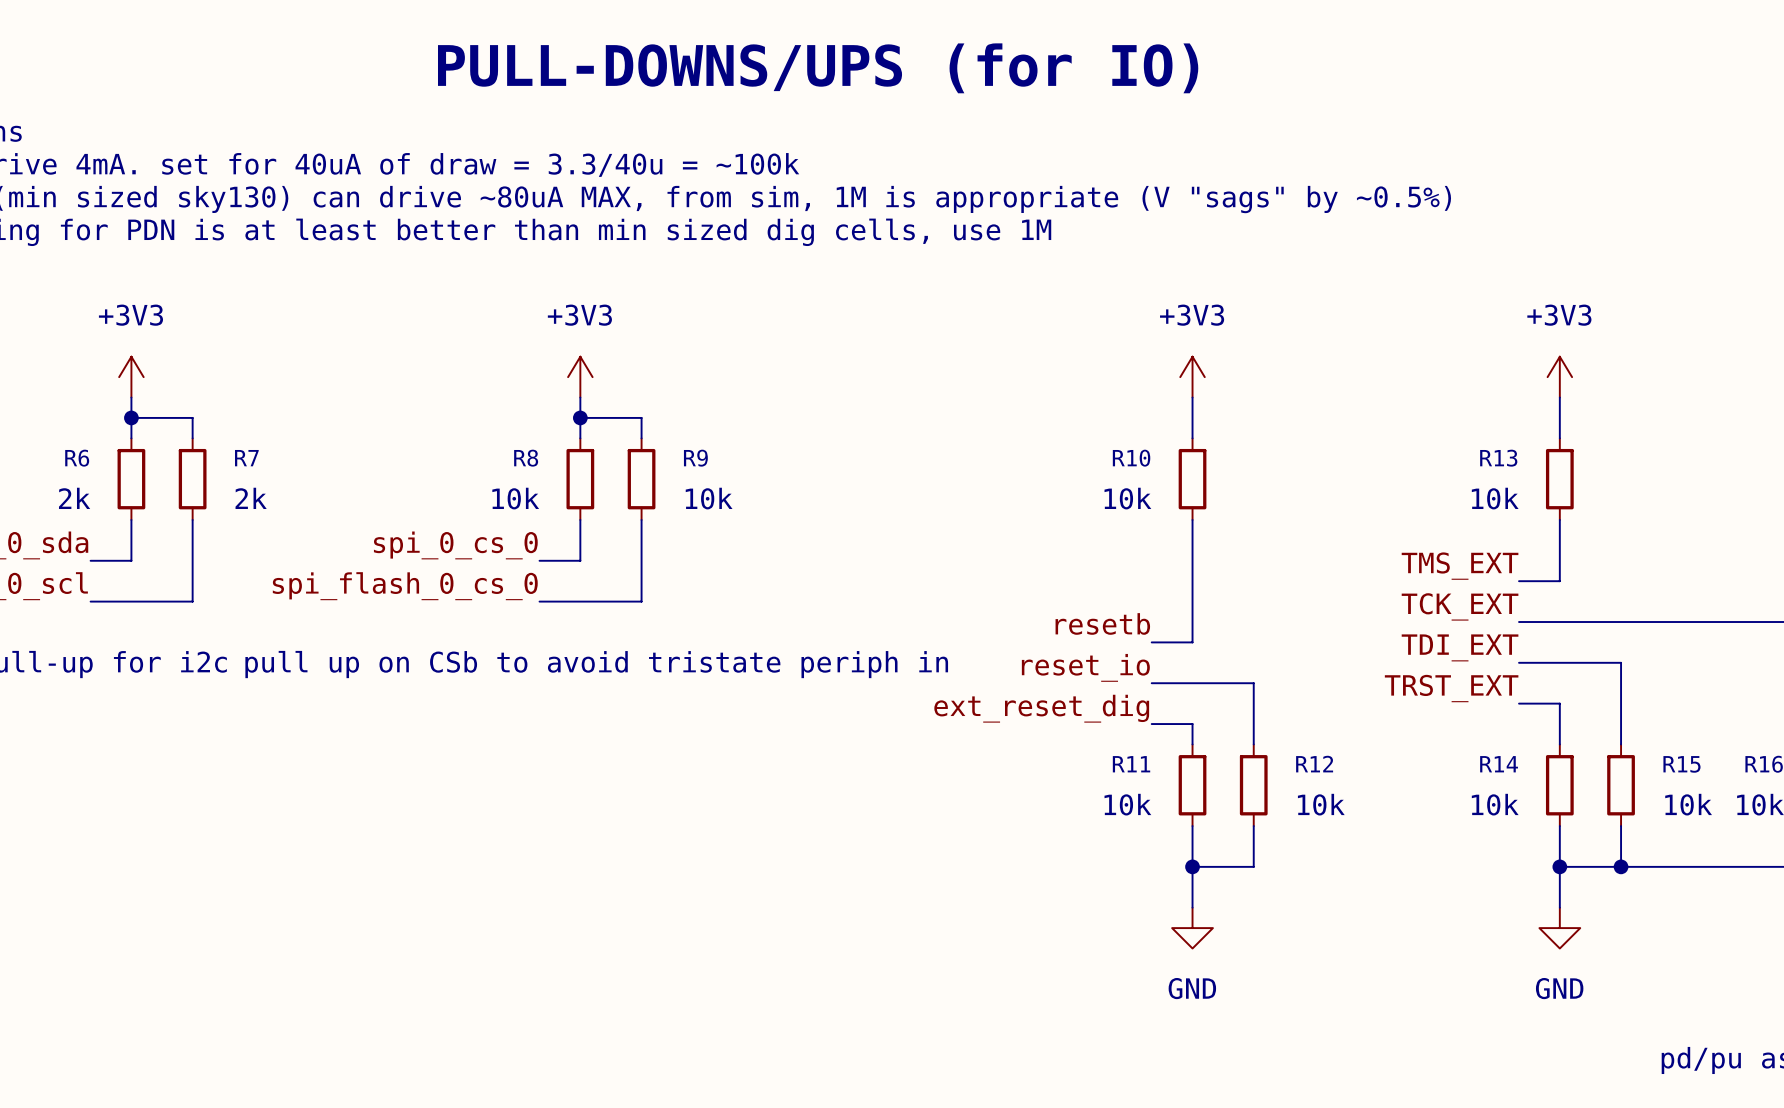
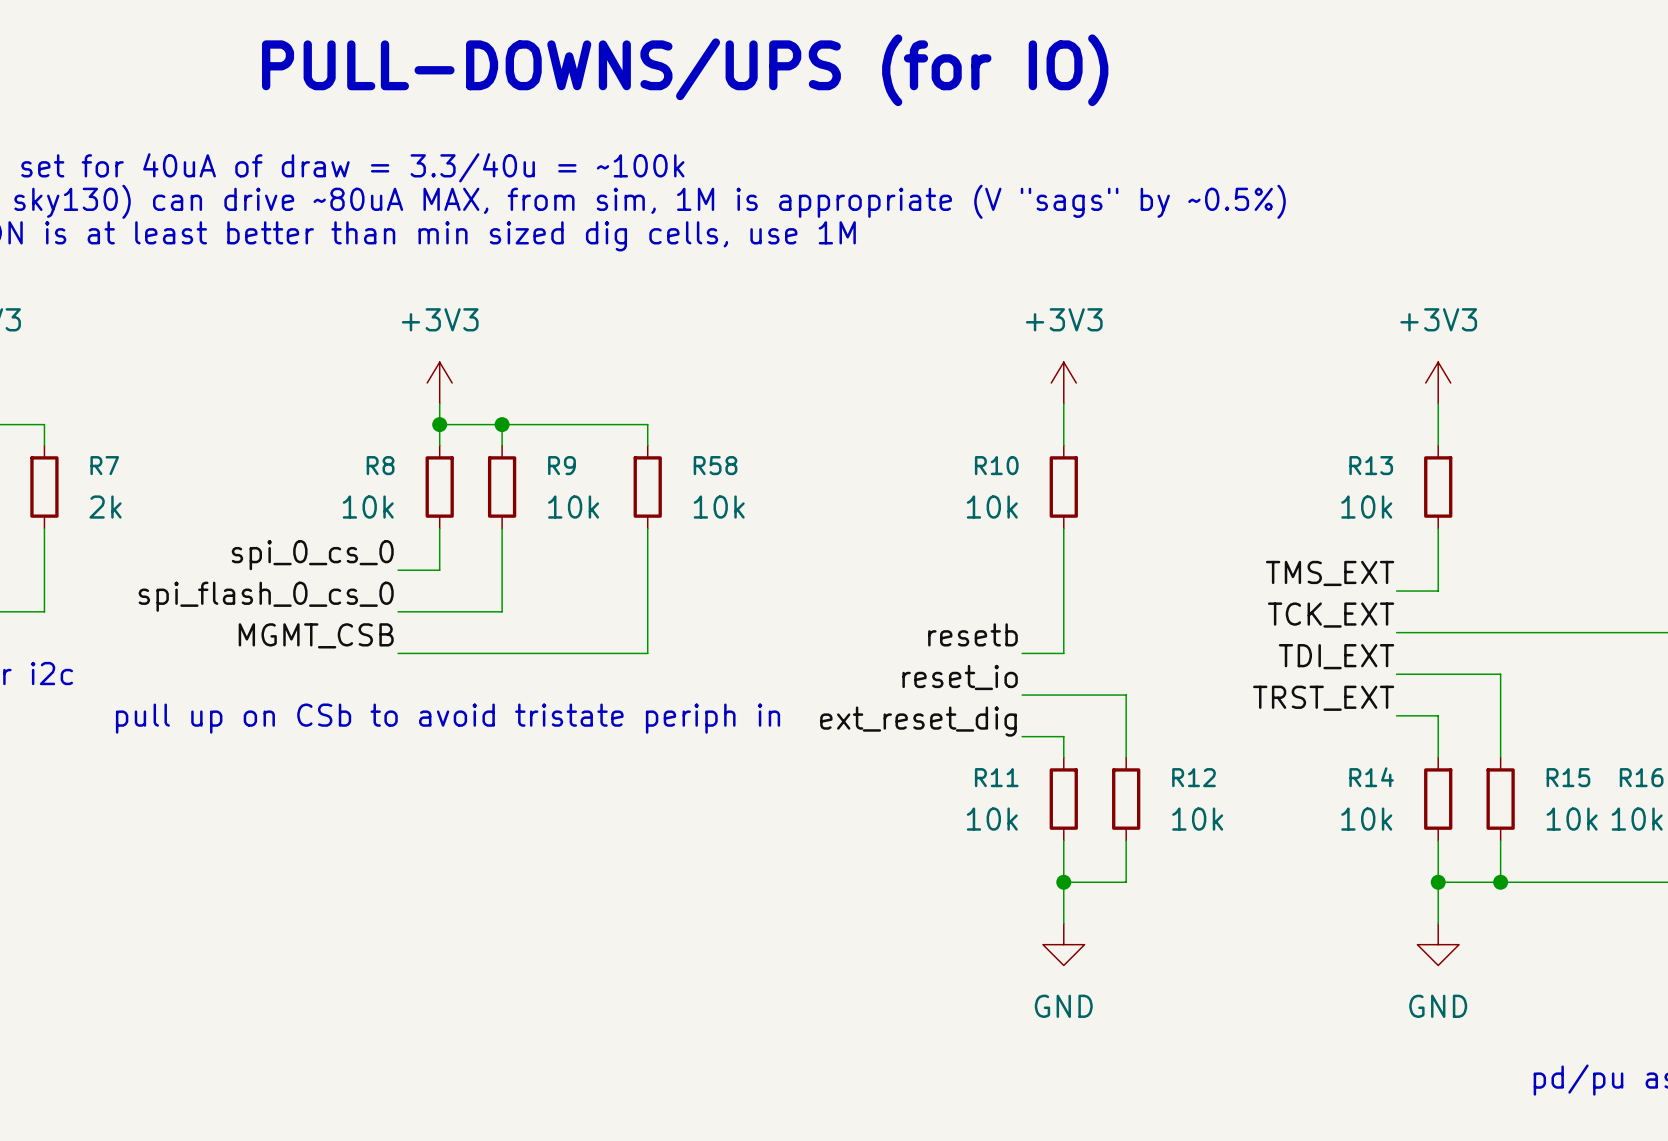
wire: none -> (502, 424) (647, 424) (647, 445)
junction: none -> (502, 424)
R58: none -> 10k (647, 487)
wire: none -> (647, 528) (647, 653) (398, 653)
label: none -> MGMT_CSB (316, 635)
text position: pull up on CSb to avoid tristate periph in (596, 664) -> pull up on CSb to avoid tristate periph in (448, 718)

